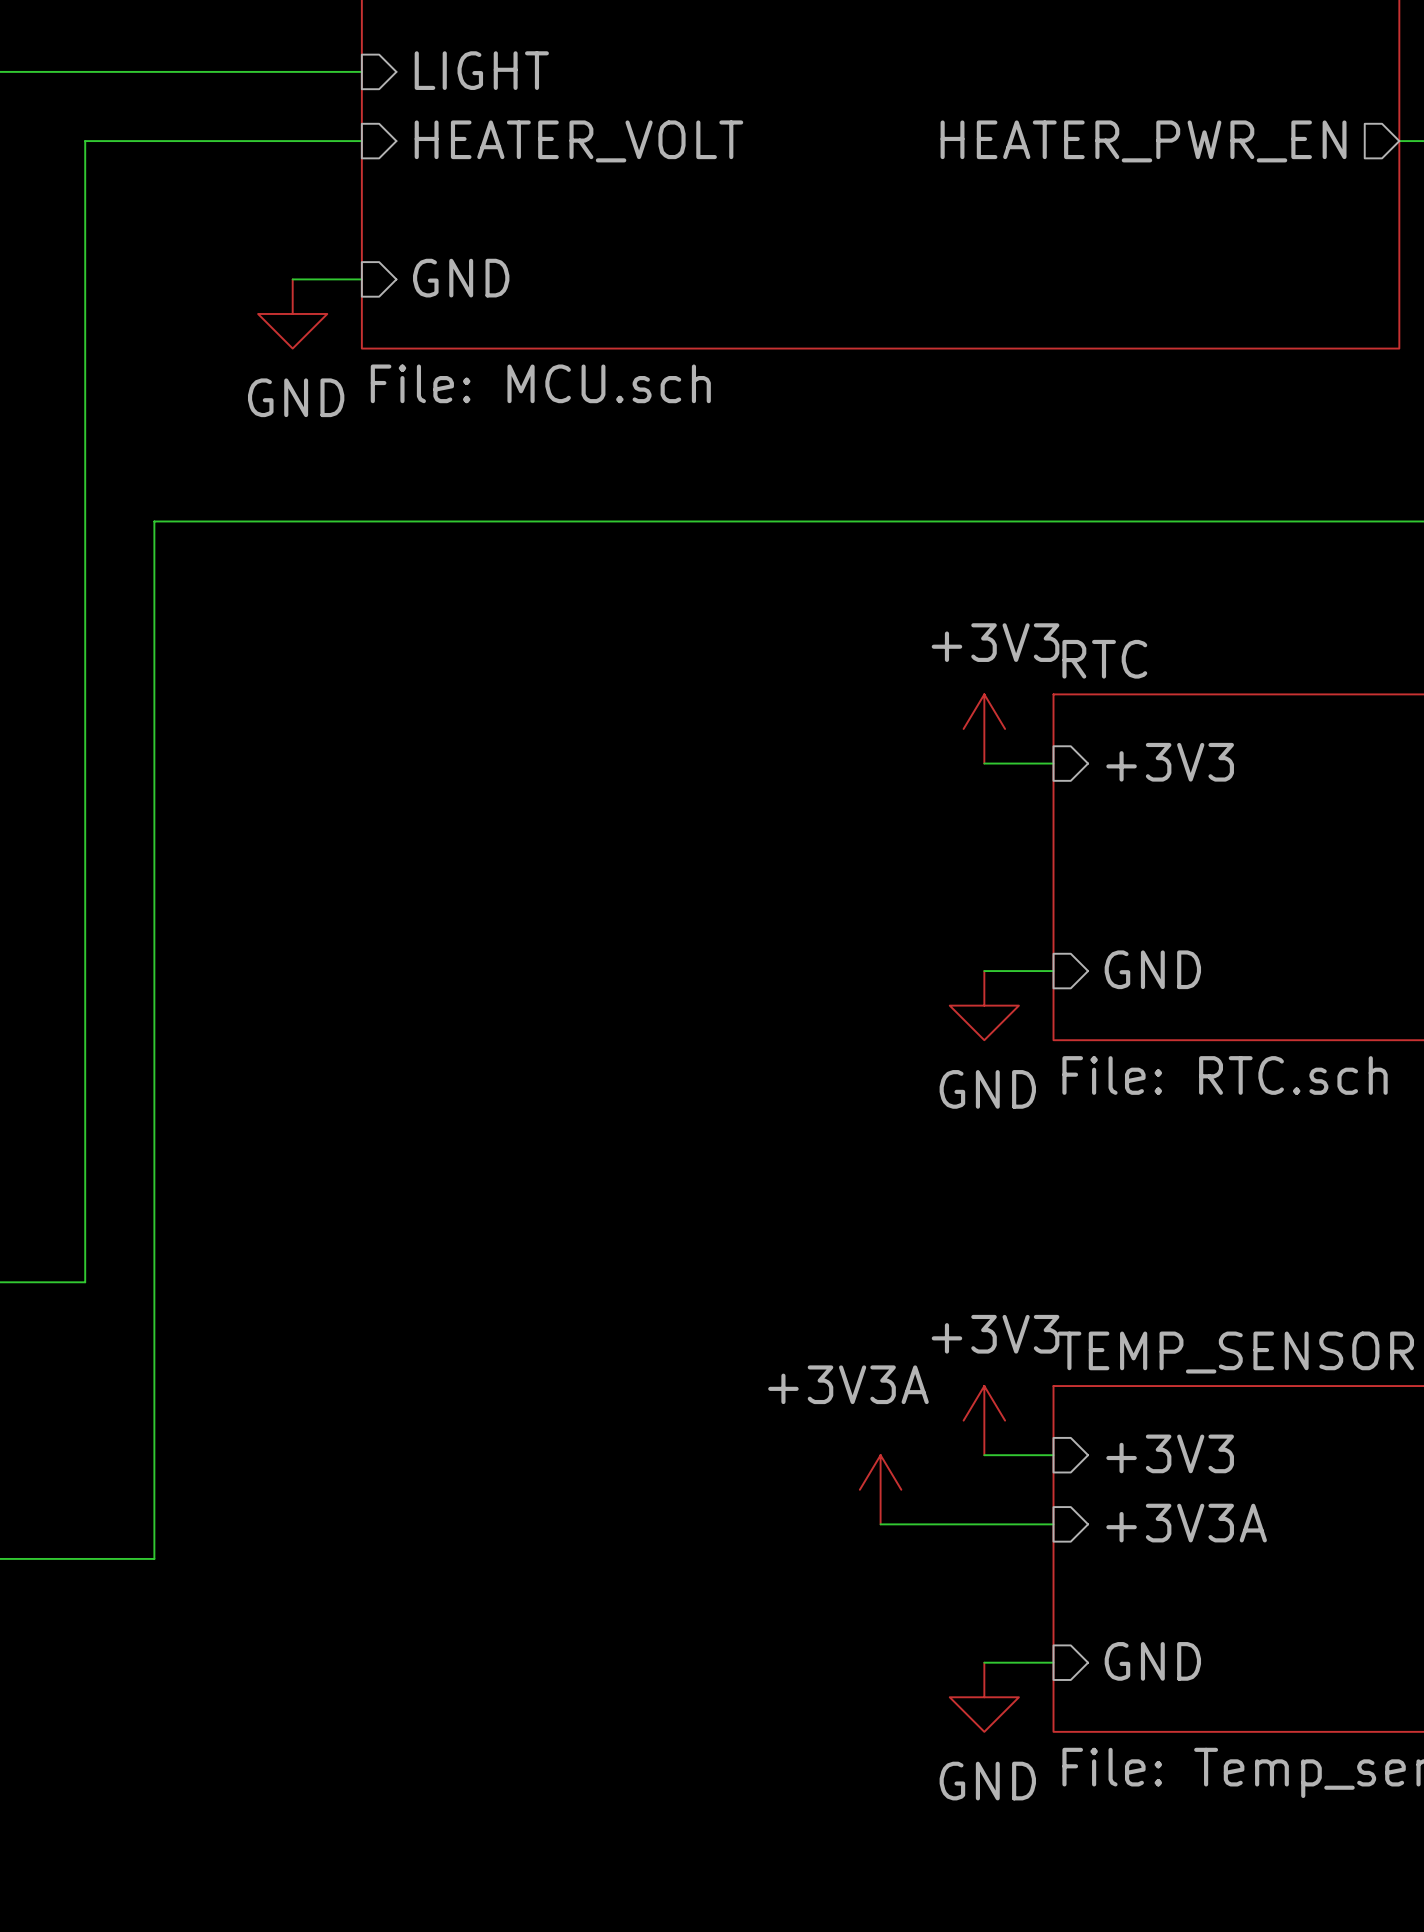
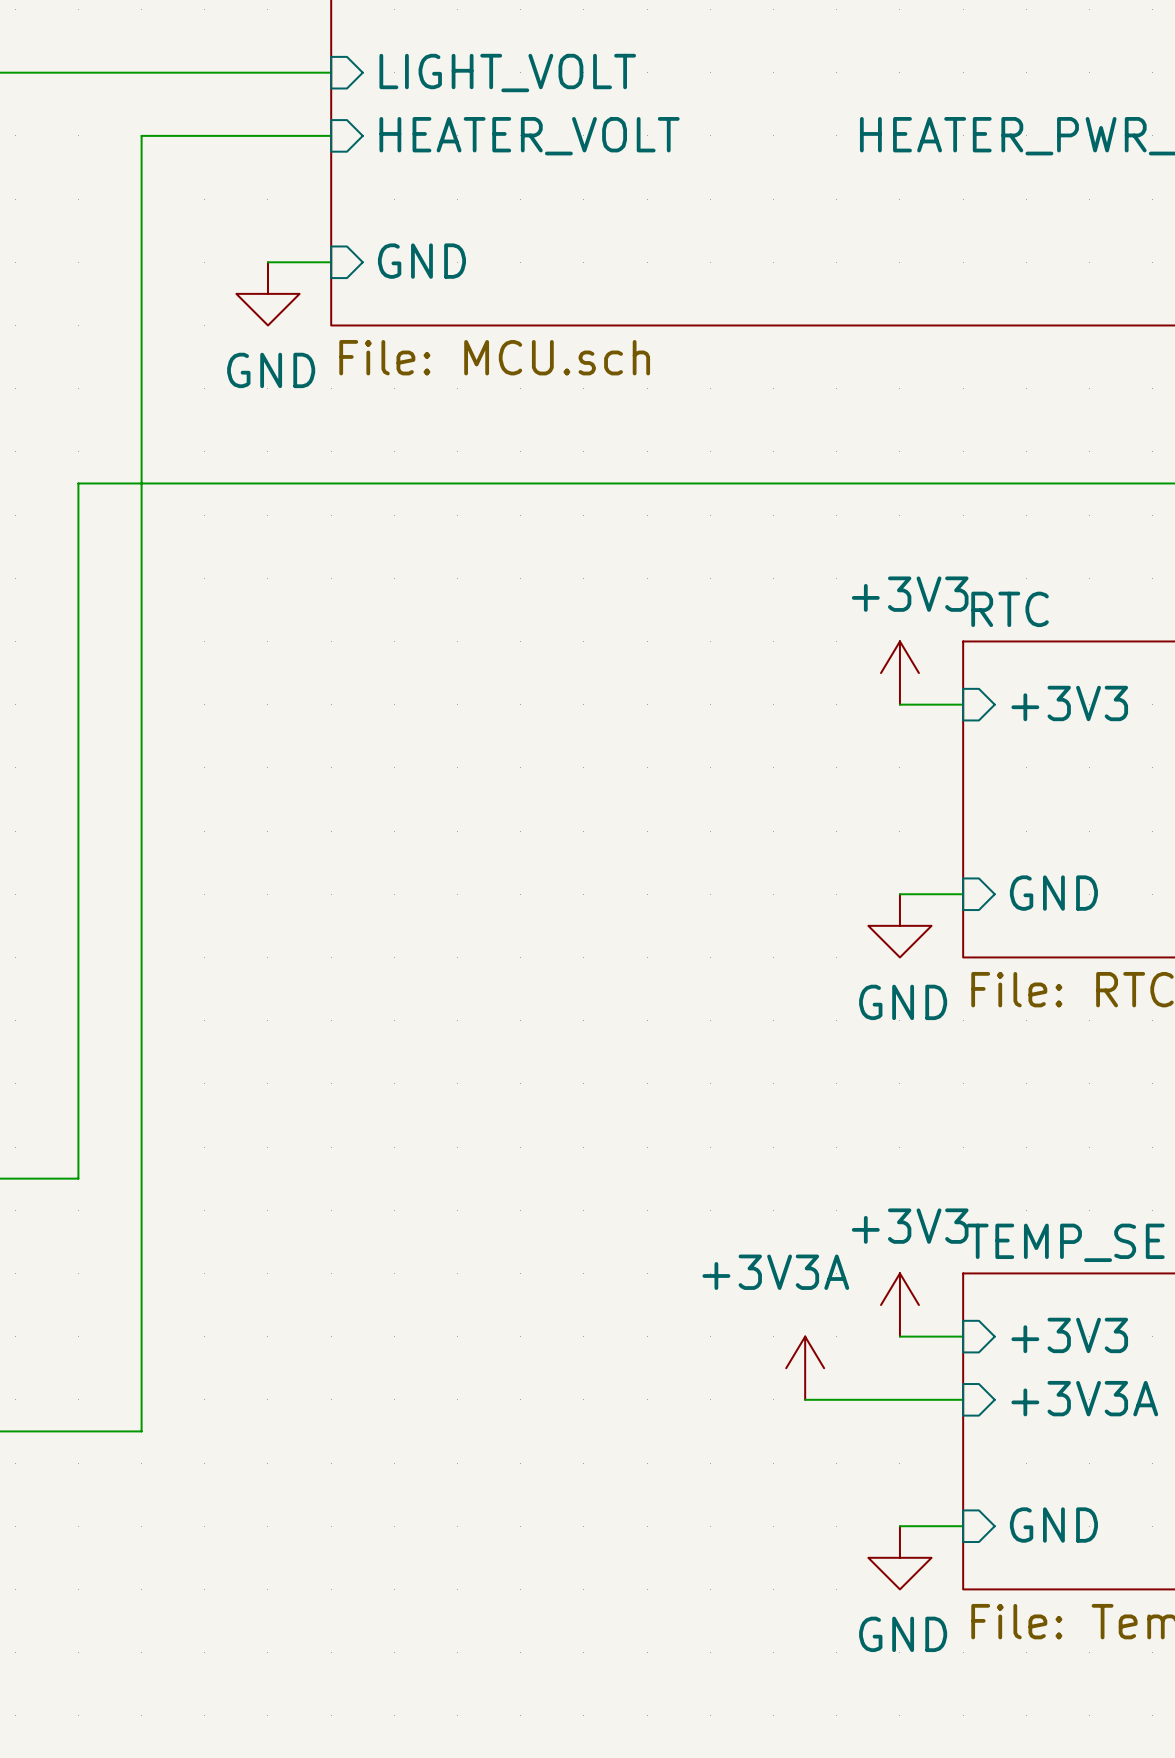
sheet pin: LIGHT (481, 70) -> LIGHT_VOLT (507, 73)
wire: (154, 141) (85, 141) (85, 521) -> (141, 135) (141, 483) (78, 483)

